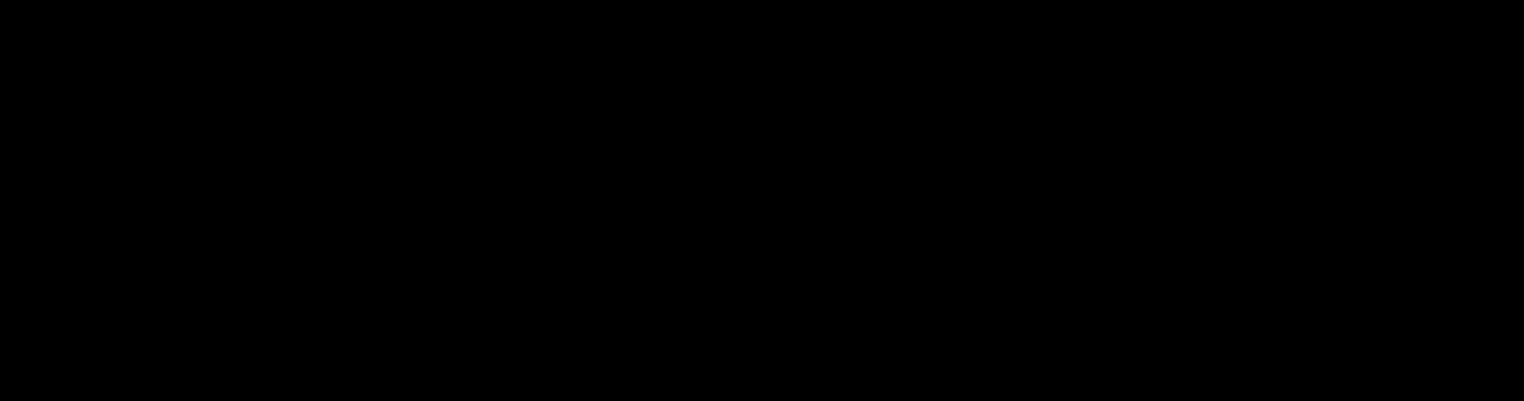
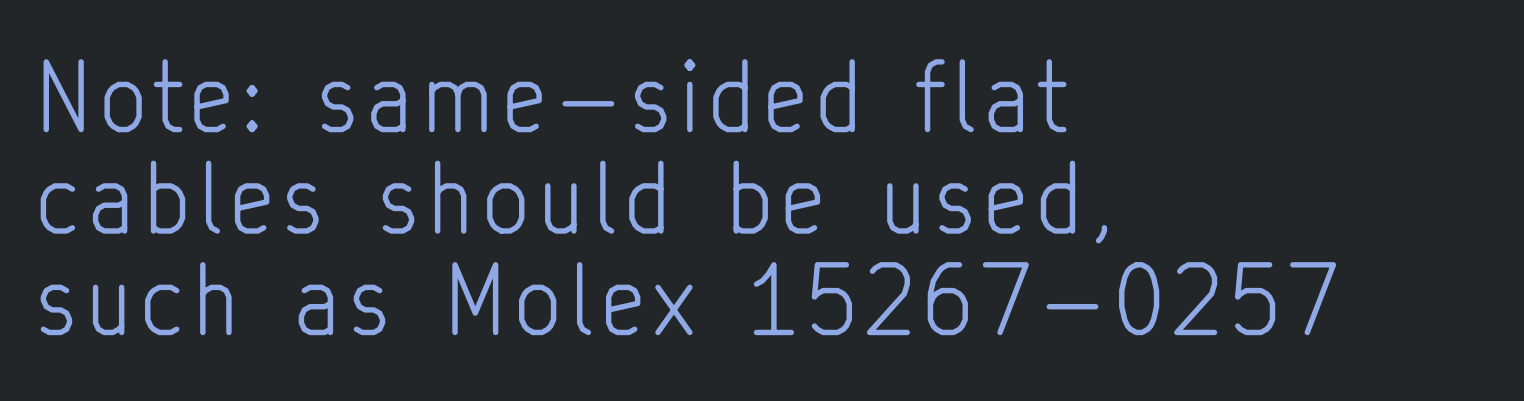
text: none -> Note: same-sided flat (555, 95)
text: none -> cables should be used, (573, 202)
text: none -> such as Molex 15267-0257 (688, 298)

